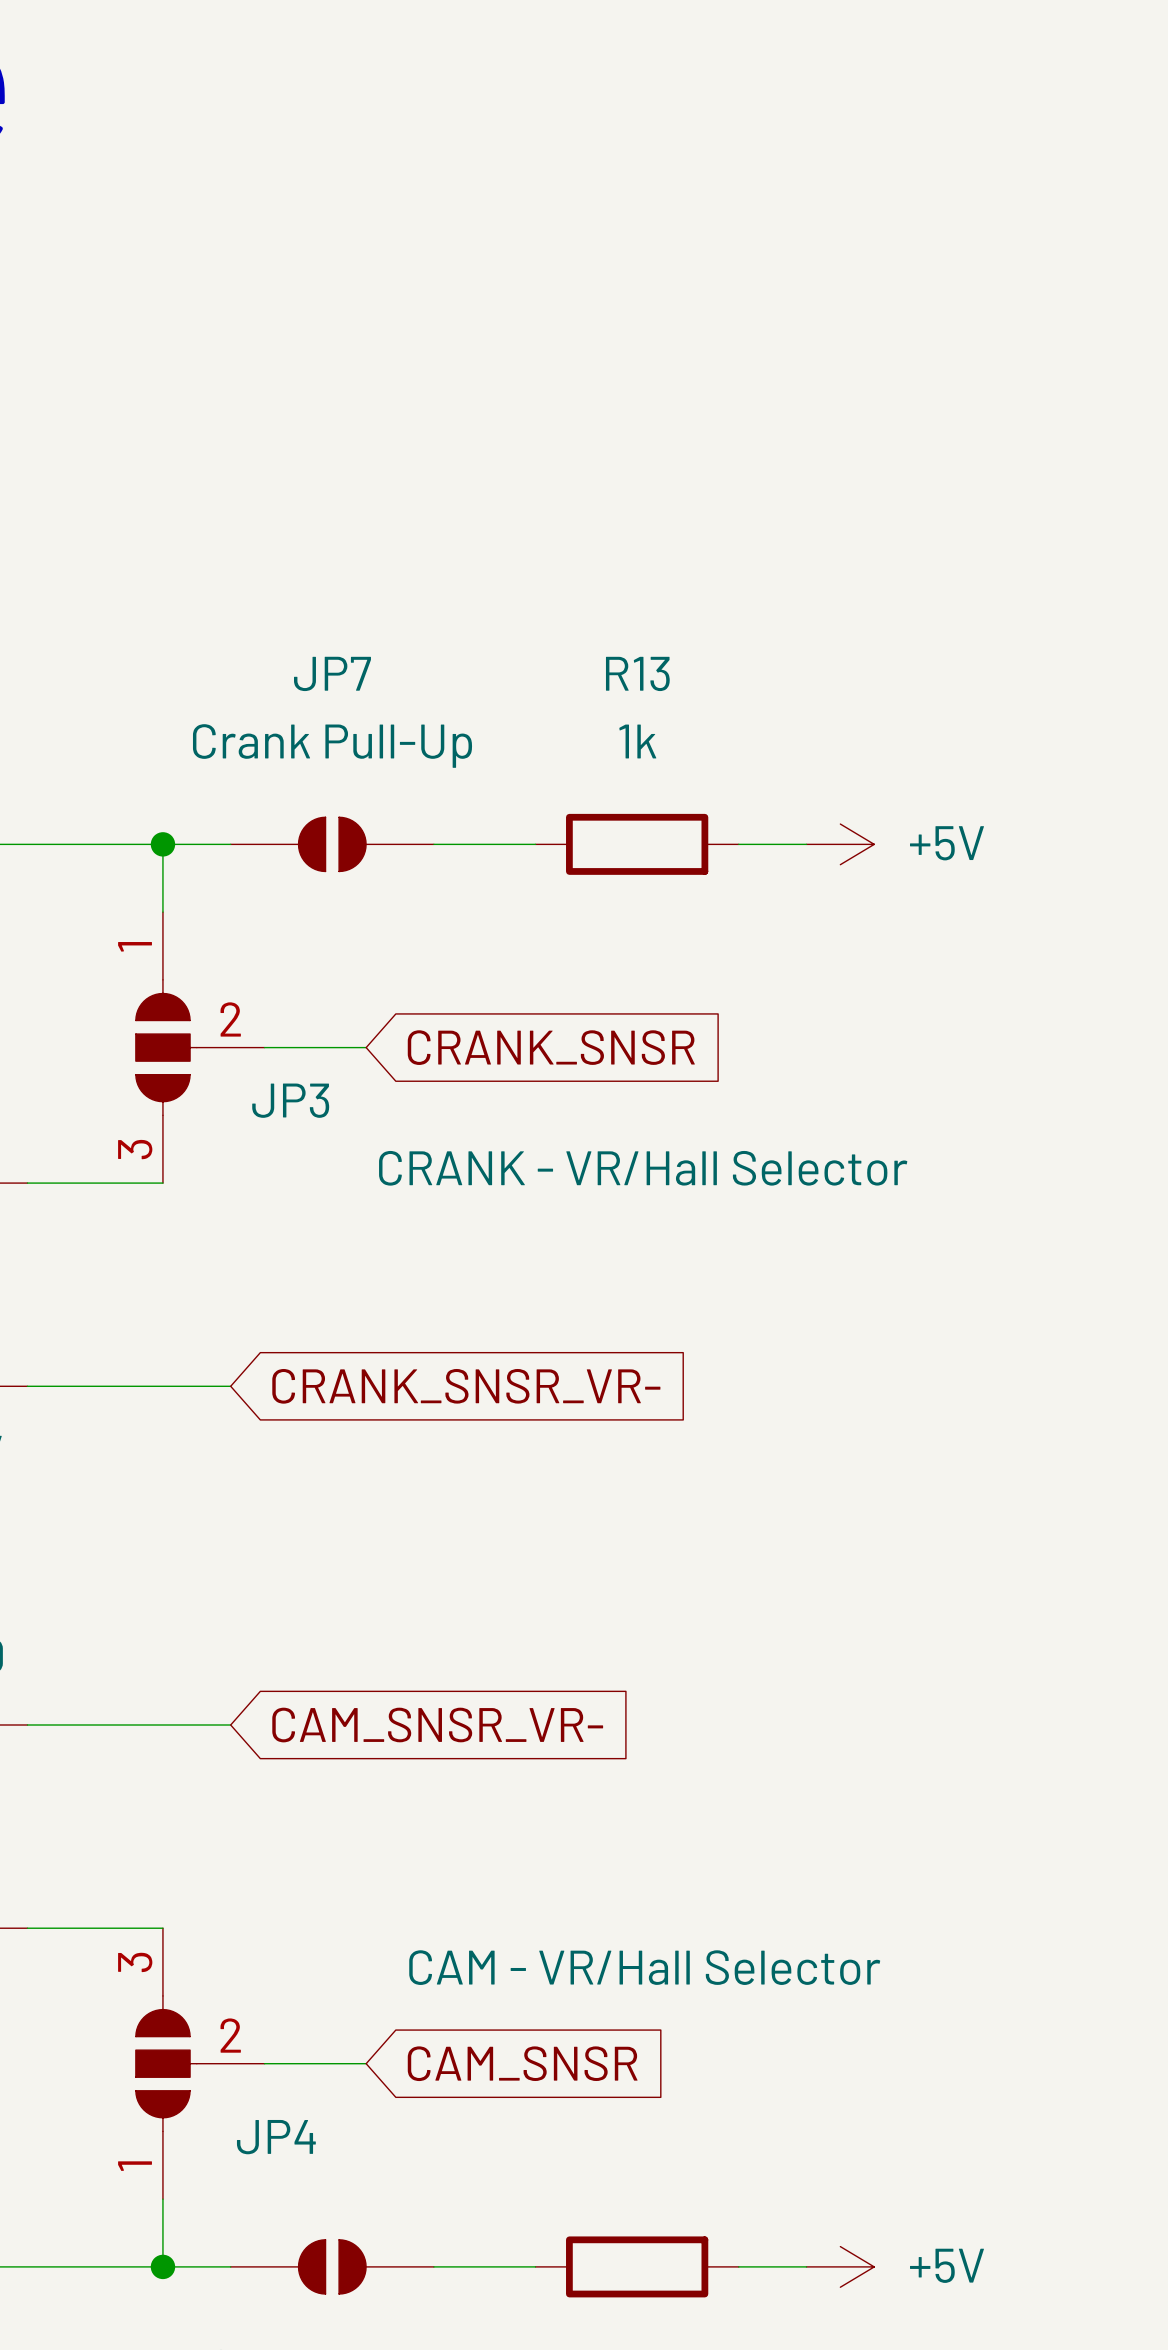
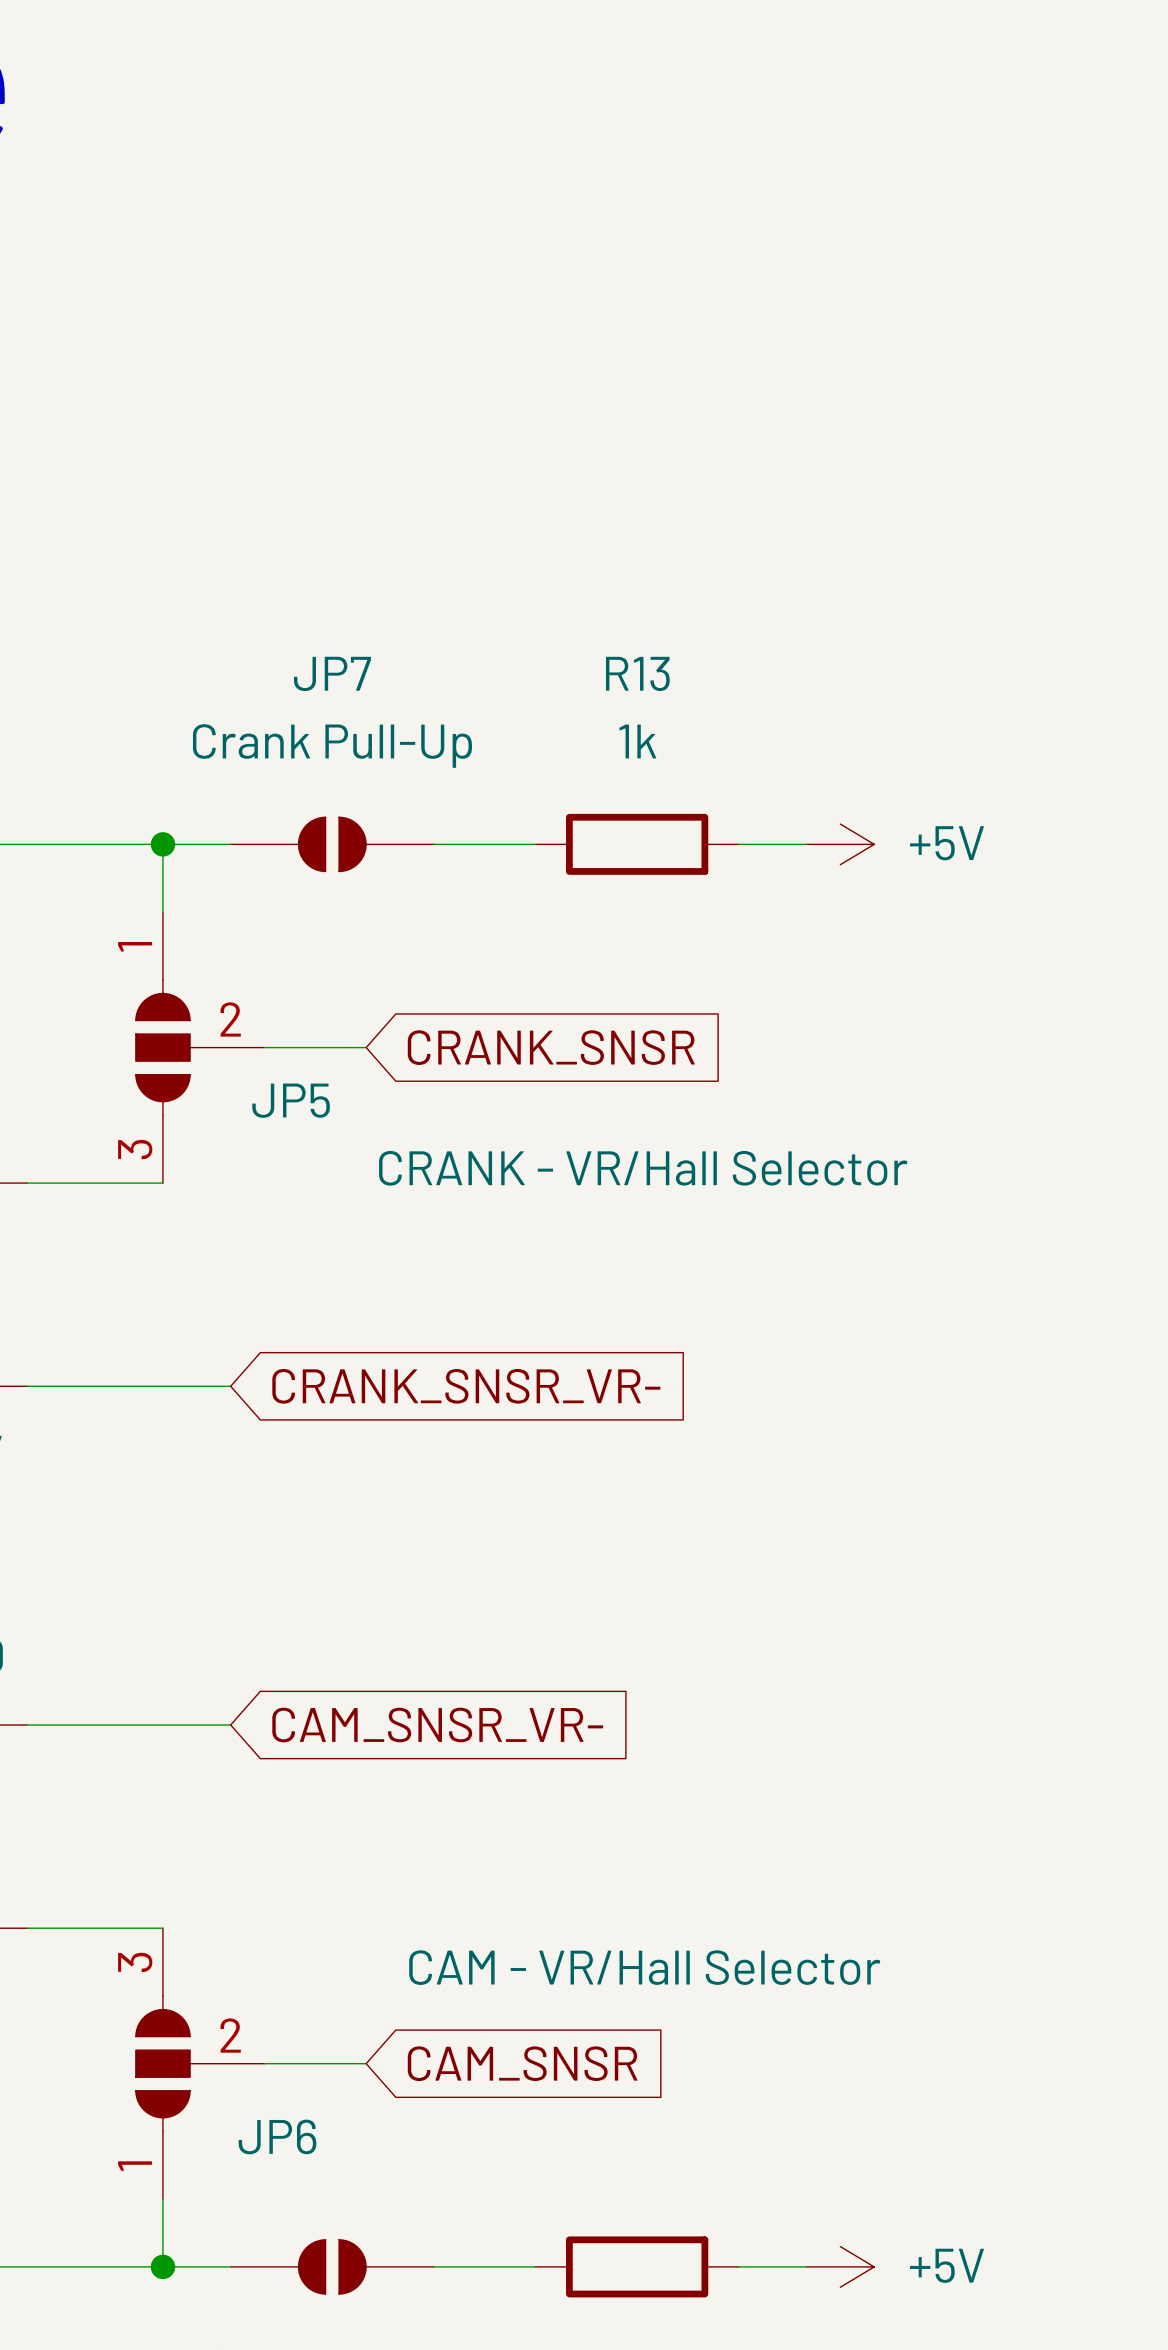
JP3 name: JP3 (290, 1100) -> JP5 (291, 1100)
JP4 name: JP4 (276, 2137) -> JP6 (277, 2136)

